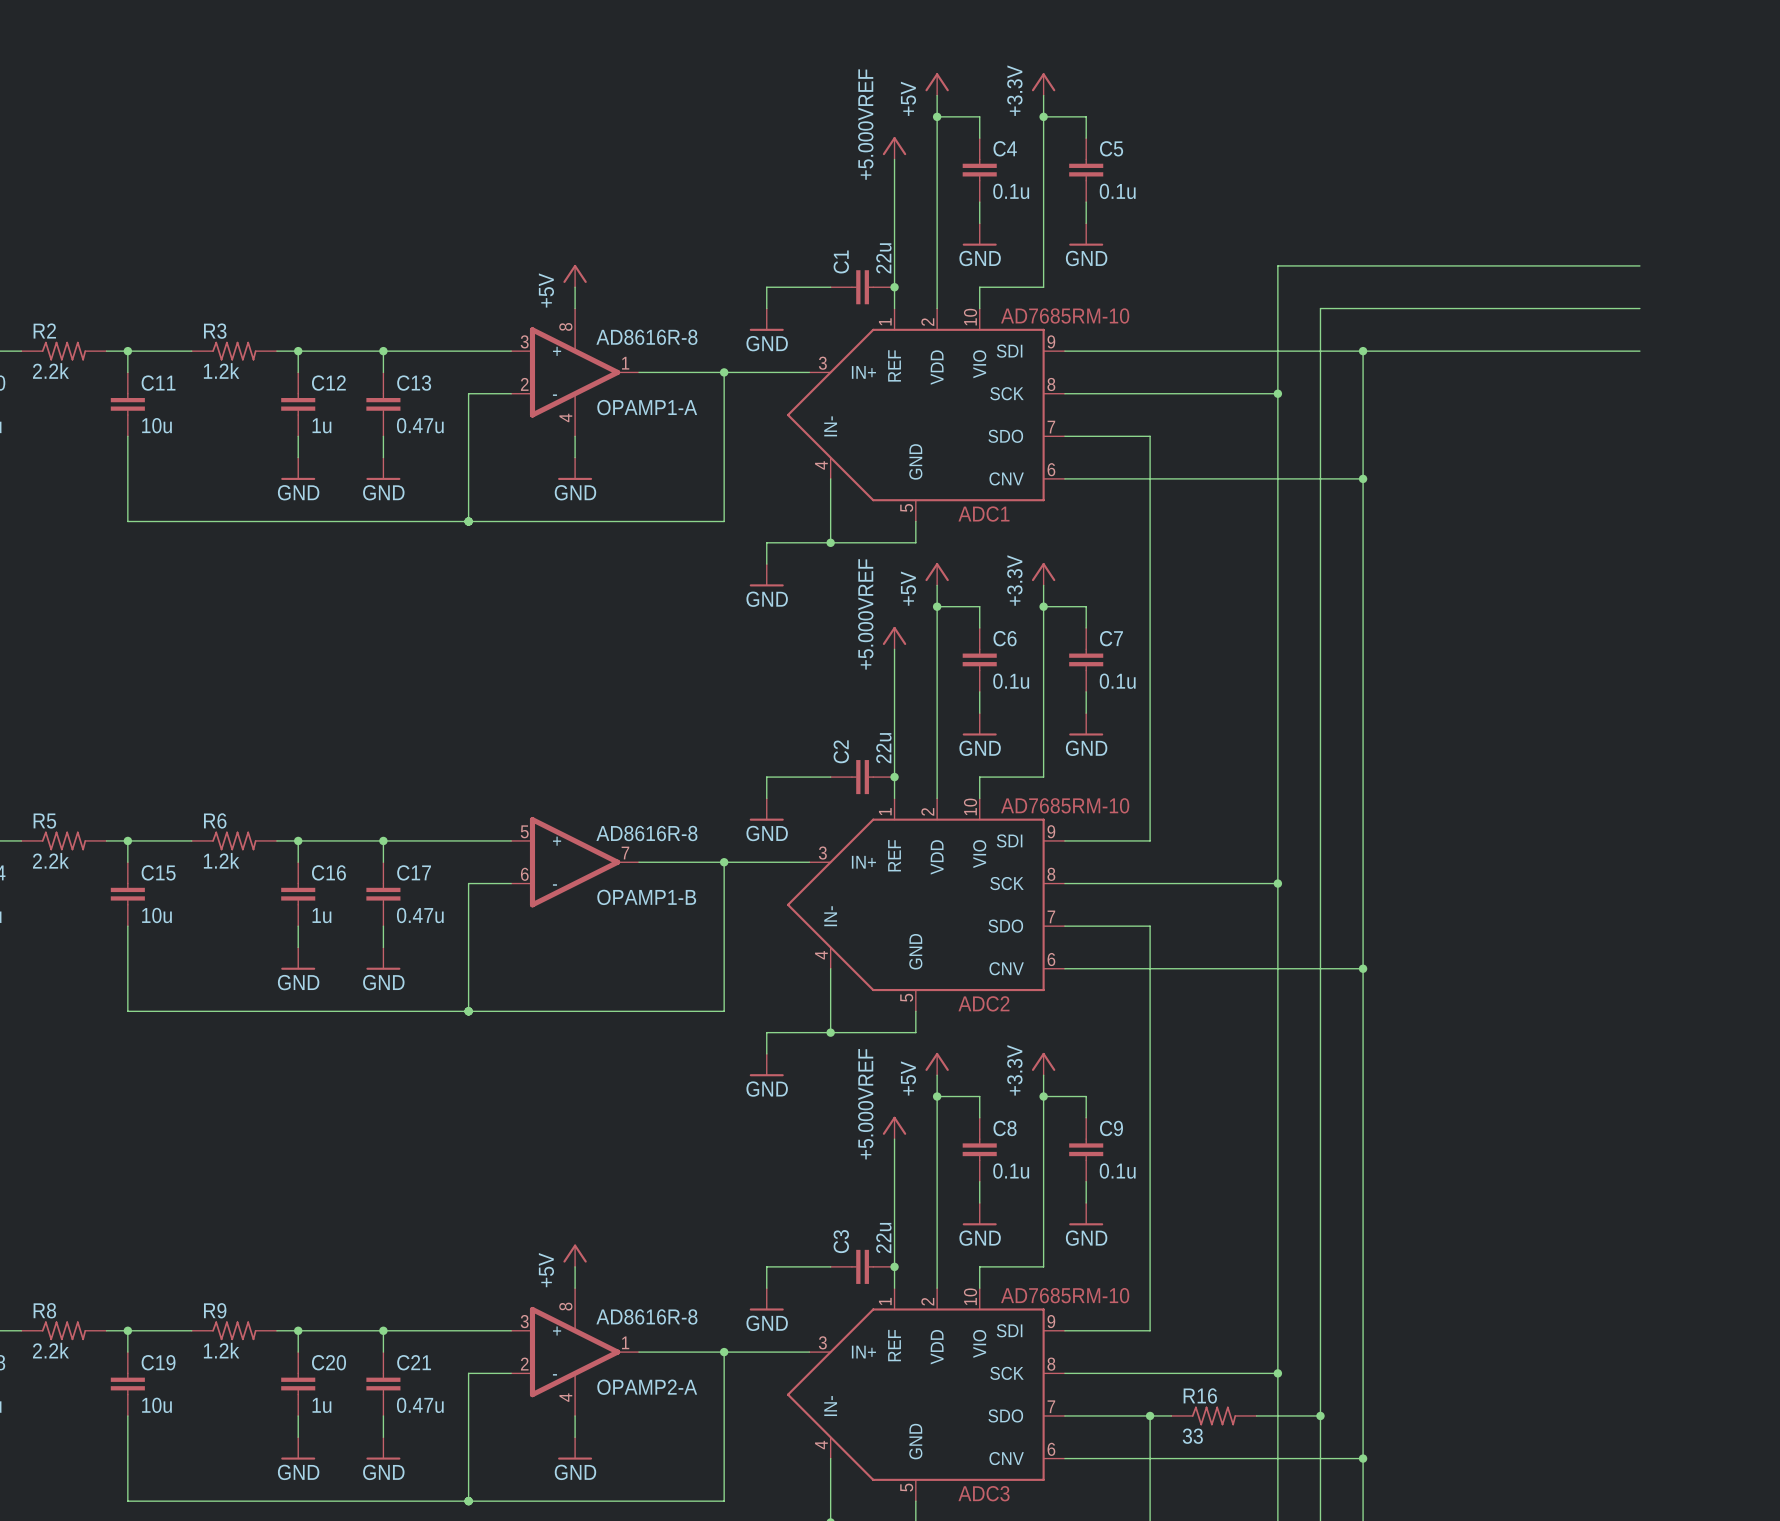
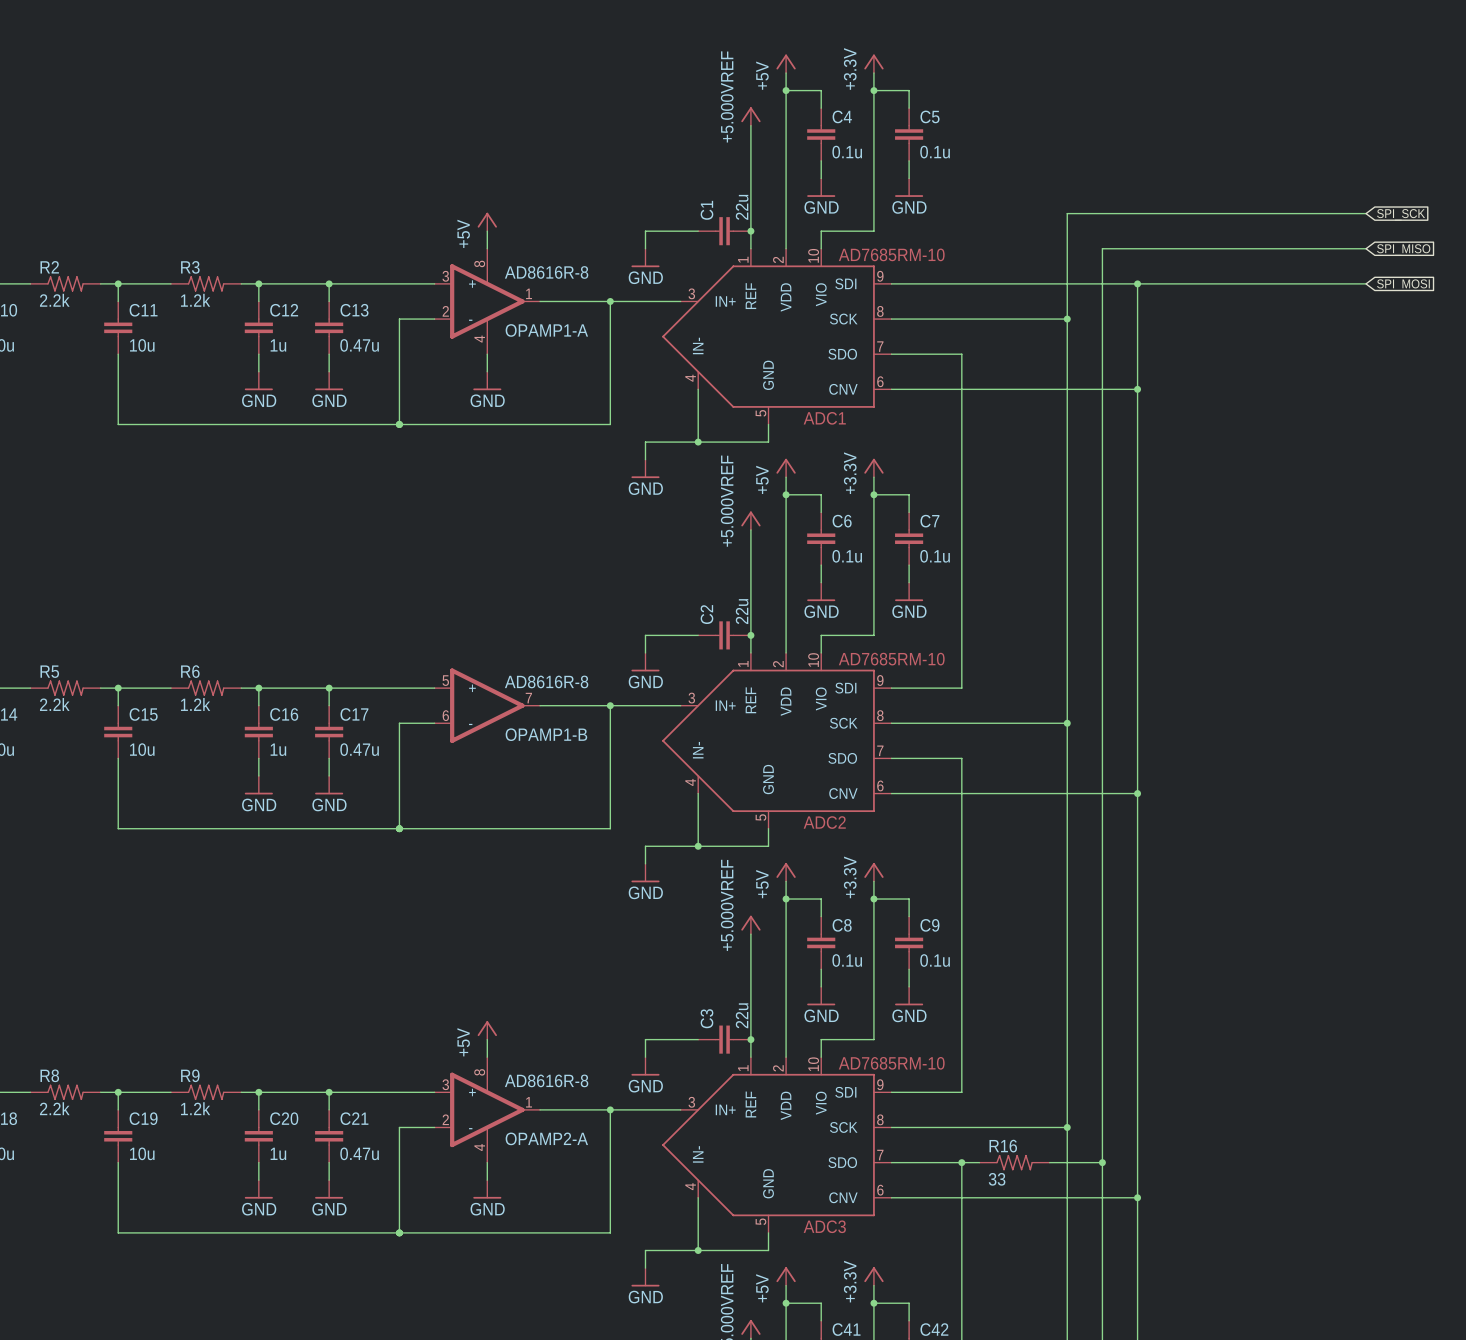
global label: none -> SPI_SCK (1401, 214)
global label: none -> SPI_MISO (1403, 249)
global label: none -> SPI_MOSI (1403, 285)

